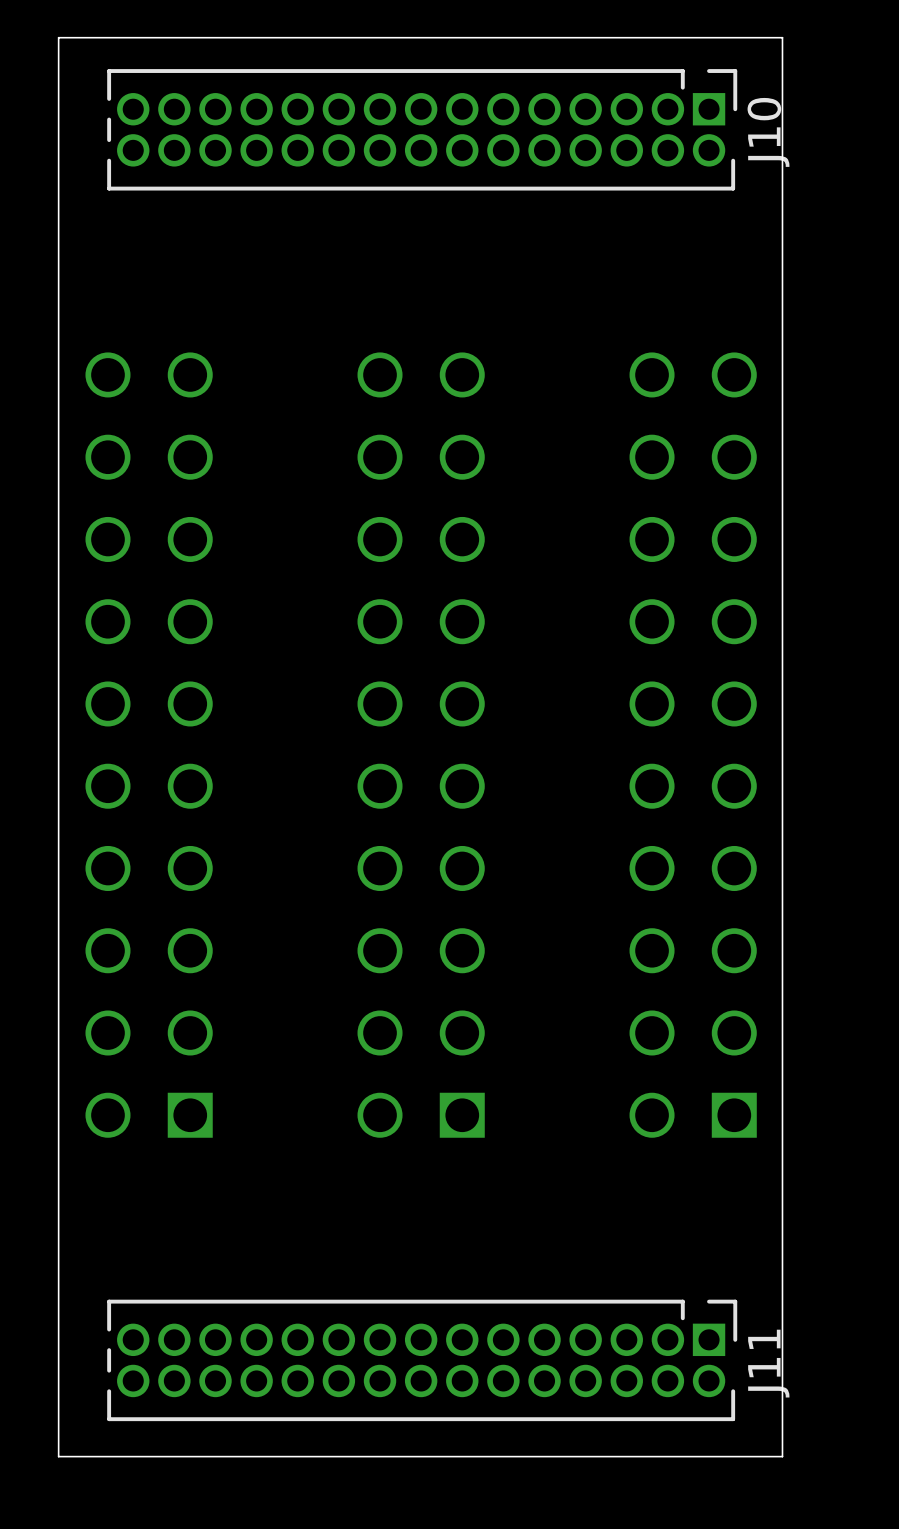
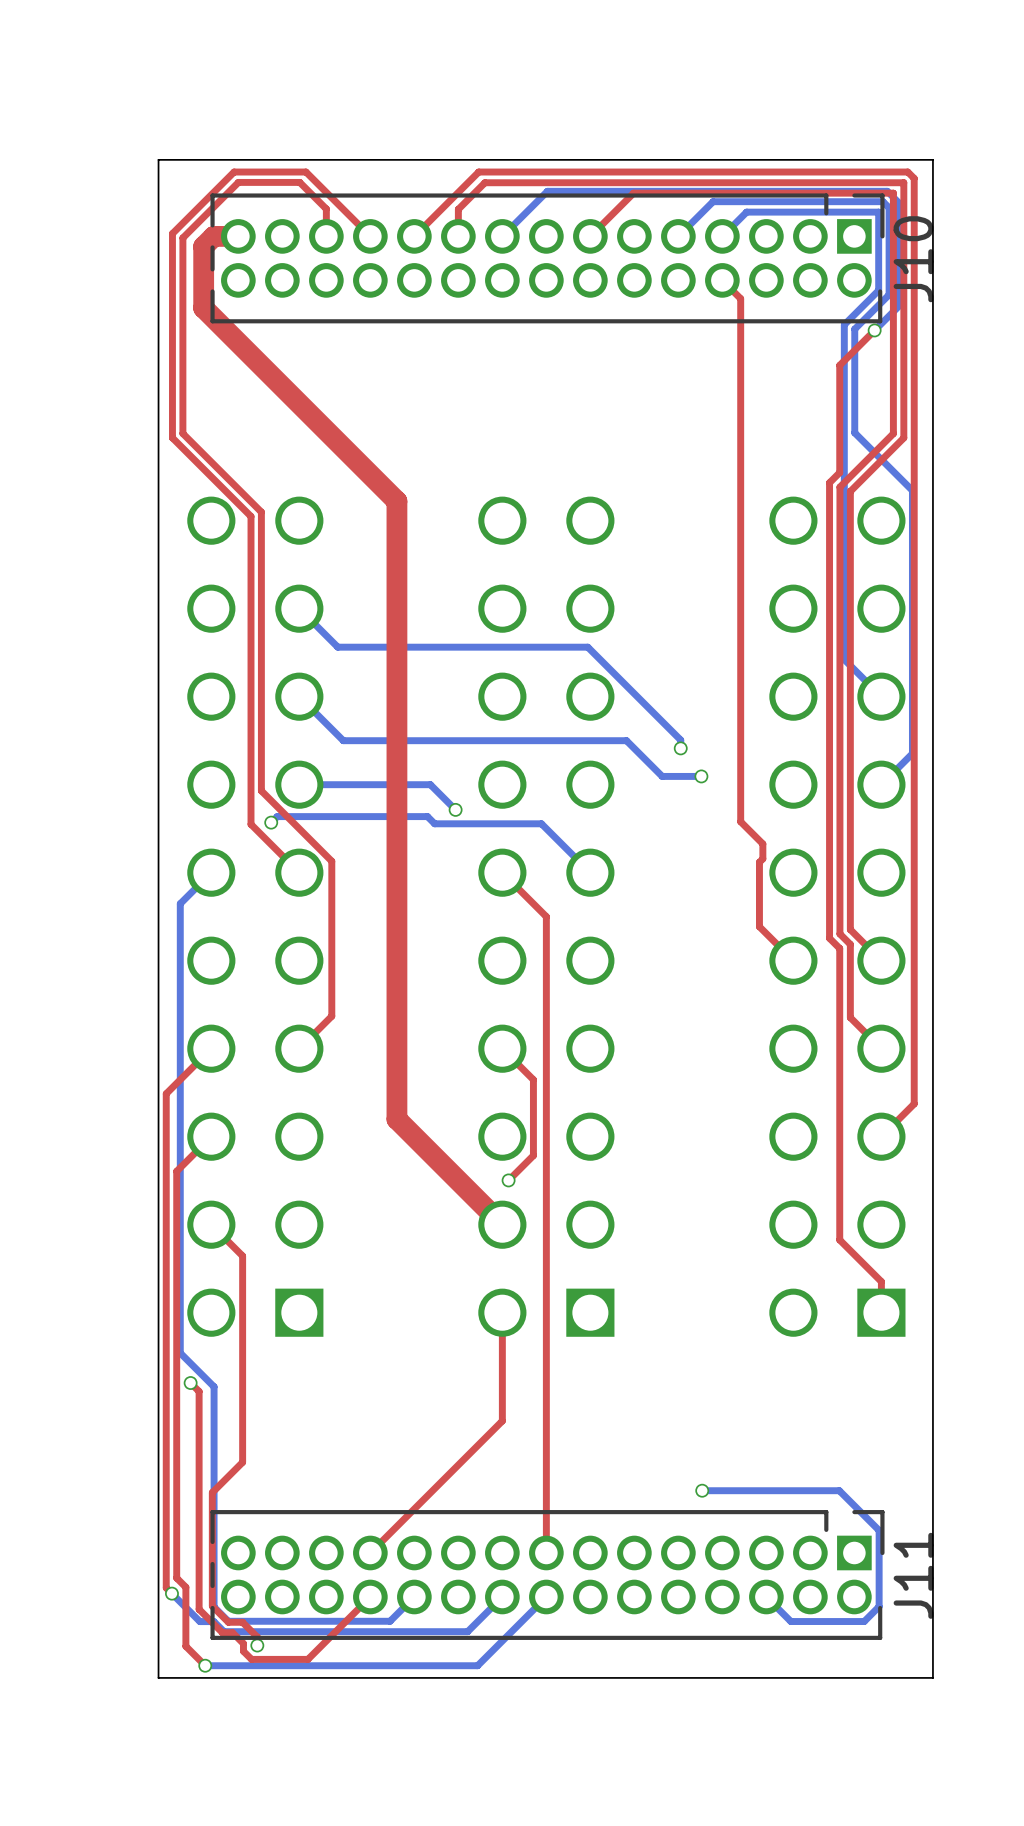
top track: none -> (238, 236) (213, 236) (203, 246) (203, 308) (396, 501) (396, 1119) (502, 1224)
top track: none -> (326, 236) (326, 209) (299, 182) (238, 182) (182, 237) (182, 433) (261, 512) (261, 790) (331, 861) (331, 1016) (299, 1048)
top track: none -> (370, 236) (305, 172) (234, 172) (172, 233) (172, 437) (251, 516) (251, 824) (299, 872)
top track: none -> (414, 236) (478, 172) (907, 172) (914, 178) (914, 1103) (881, 1136)
top track: none -> (458, 236) (458, 209) (484, 182) (903, 182) (903, 437) (850, 491) (850, 929) (881, 960)
bottom track: none -> (502, 236) (547, 191) (887, 191) (899, 203) (899, 305) (874, 330)
top track: none -> (590, 236) (633, 193) (893, 193) (893, 433) (839, 487) (839, 933) (850, 944) (850, 1017) (881, 1048)
bottom track: none -> (678, 236) (713, 201) (882, 201) (889, 207) (889, 294) (854, 329) (854, 432) (912, 490) (912, 753) (881, 784)
bottom track: none -> (722, 236) (746, 212) (878, 212) (878, 290) (844, 324) (844, 659) (881, 696)
top track: none -> (722, 280) (740, 298) (740, 821) (762, 843) (762, 858) (759, 862) (759, 926) (793, 960)
top track: none -> (874, 330) (839, 365) (839, 472) (829, 482) (829, 938) (839, 948) (839, 1239) (881, 1281) (881, 1312)
via: none -> (874, 330)
bottom track: none -> (299, 608) (337, 647) (587, 647) (680, 740) (680, 748)
bottom track: none -> (299, 696) (343, 740) (626, 740) (662, 776) (701, 776)
via: none -> (680, 748)
via: none -> (701, 776)
bottom track: none -> (299, 784) (430, 784) (455, 809)
via: none -> (455, 809)
bottom track: none -> (271, 822) (277, 816) (427, 816) (434, 823) (541, 823) (590, 872)
via: none -> (271, 822)
bottom track: none -> (211, 872) (180, 903) (180, 1353) (214, 1386) (214, 1607) (228, 1621) (390, 1621) (414, 1596)
top track: none -> (502, 872) (546, 916) (546, 1552)
top track: none -> (211, 1048) (166, 1093) (166, 1587) (171, 1593)
top track: none -> (502, 1048) (533, 1079) (533, 1155) (508, 1180)
top track: none -> (211, 1136) (176, 1171) (176, 1578) (185, 1587) (185, 1646) (205, 1665)
via: none -> (508, 1180)
top track: none -> (211, 1224) (242, 1256) (242, 1462) (212, 1492) (212, 1606) (228, 1622) (242, 1622) (257, 1637) (257, 1645)
top track: none -> (502, 1312) (502, 1420) (370, 1552)
top track: none -> (190, 1383) (199, 1391) (199, 1609) (222, 1632) (232, 1632) (243, 1643) (243, 1651) (251, 1659) (307, 1659) (370, 1596)
via: none -> (190, 1383)
bottom track: none -> (702, 1490) (839, 1490) (879, 1530) (879, 1606) (864, 1621) (790, 1621) (766, 1596)
via: none -> (702, 1490)
bottom track: none -> (171, 1593) (199, 1621) (213, 1621) (223, 1631) (467, 1631) (502, 1596)
via: none -> (171, 1593)
bottom track: none -> (546, 1596) (477, 1665) (205, 1665)
via: none -> (257, 1645)
via: none -> (205, 1665)

